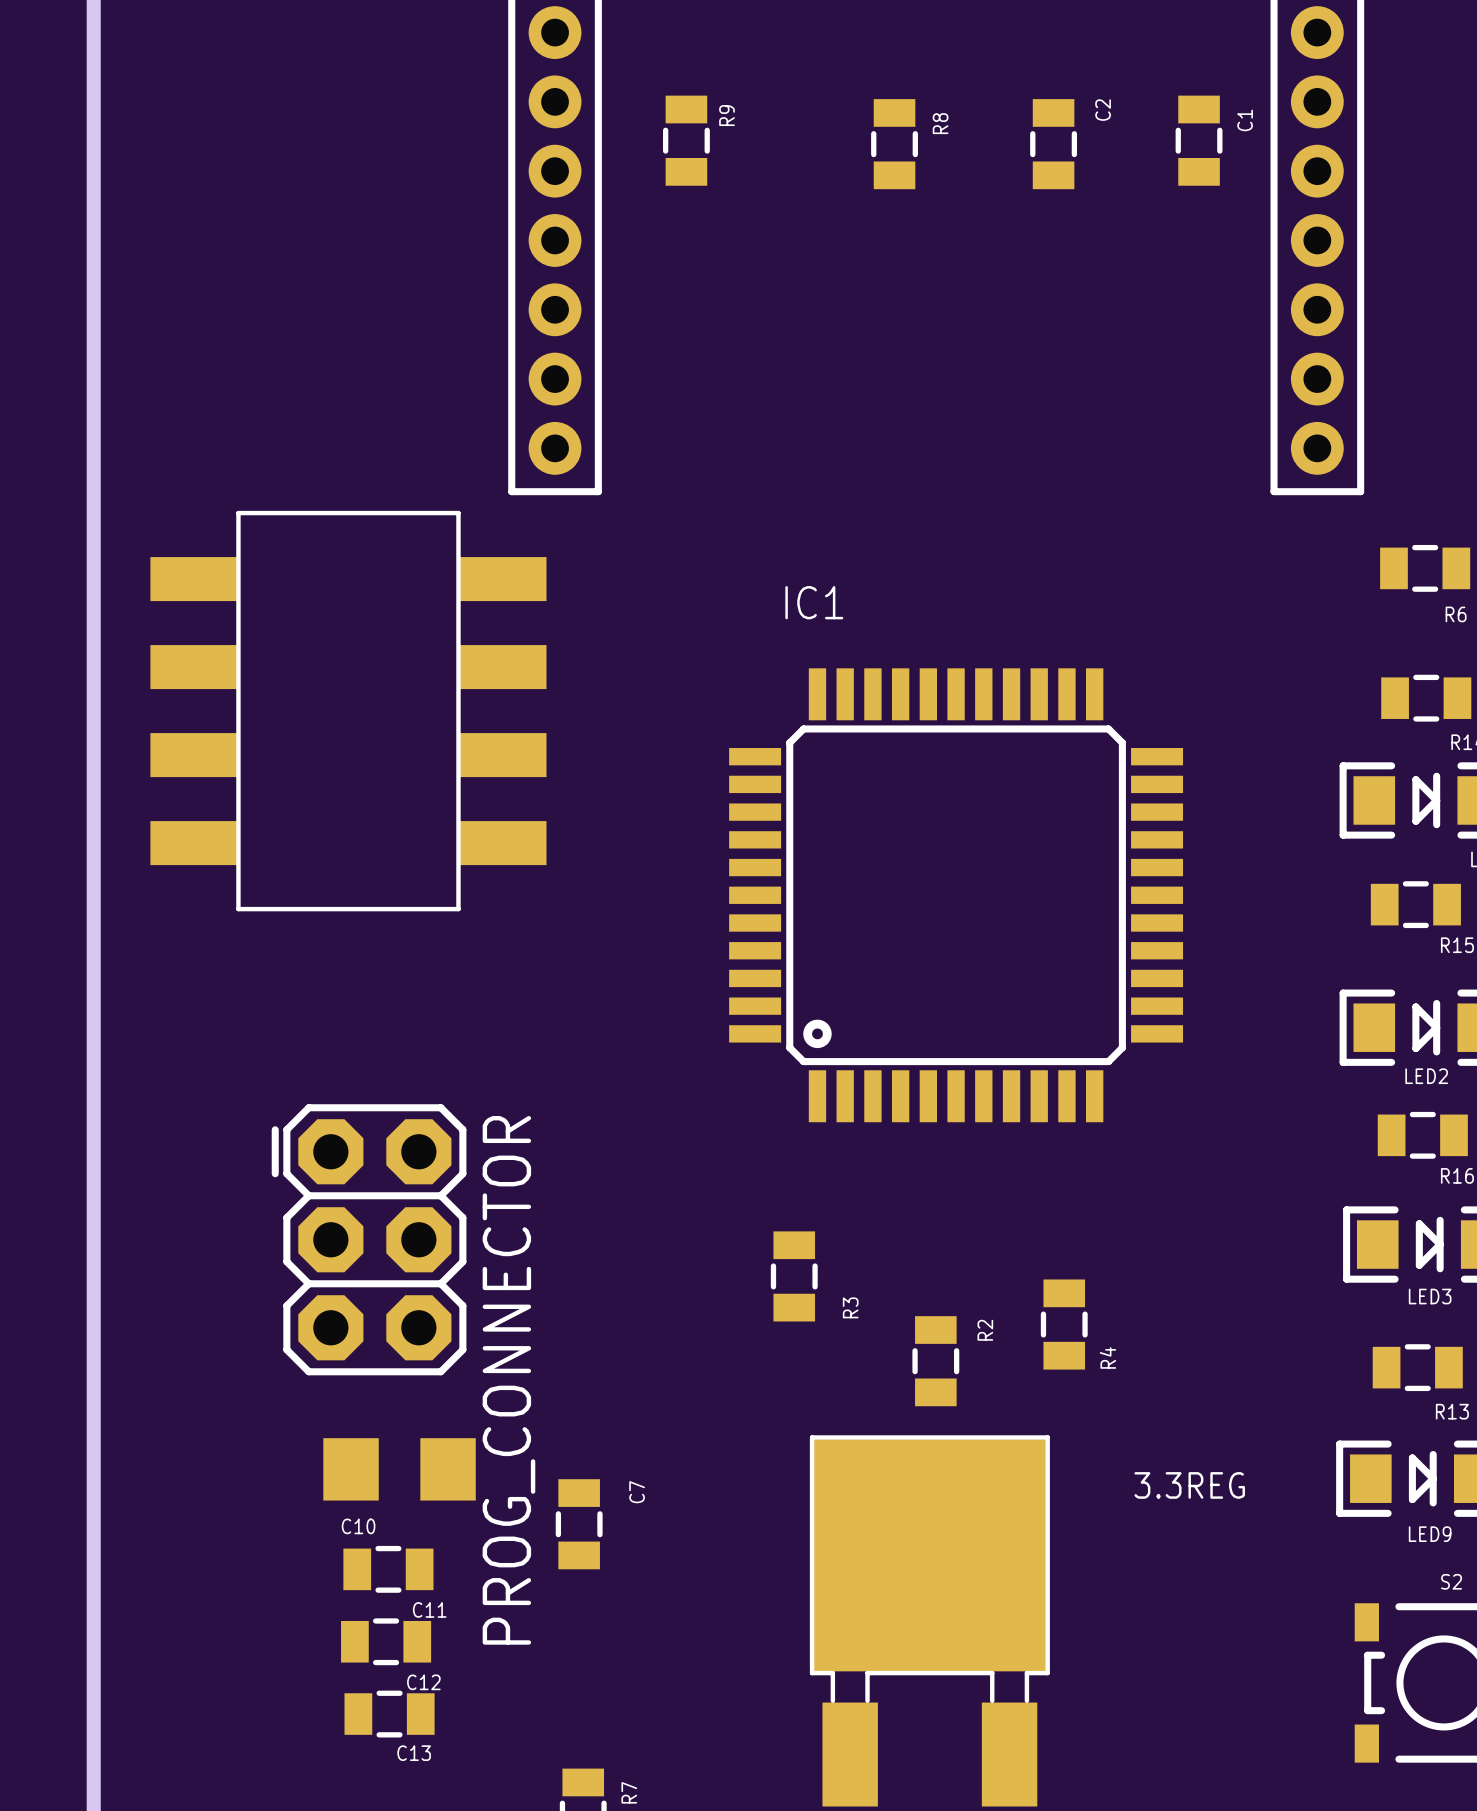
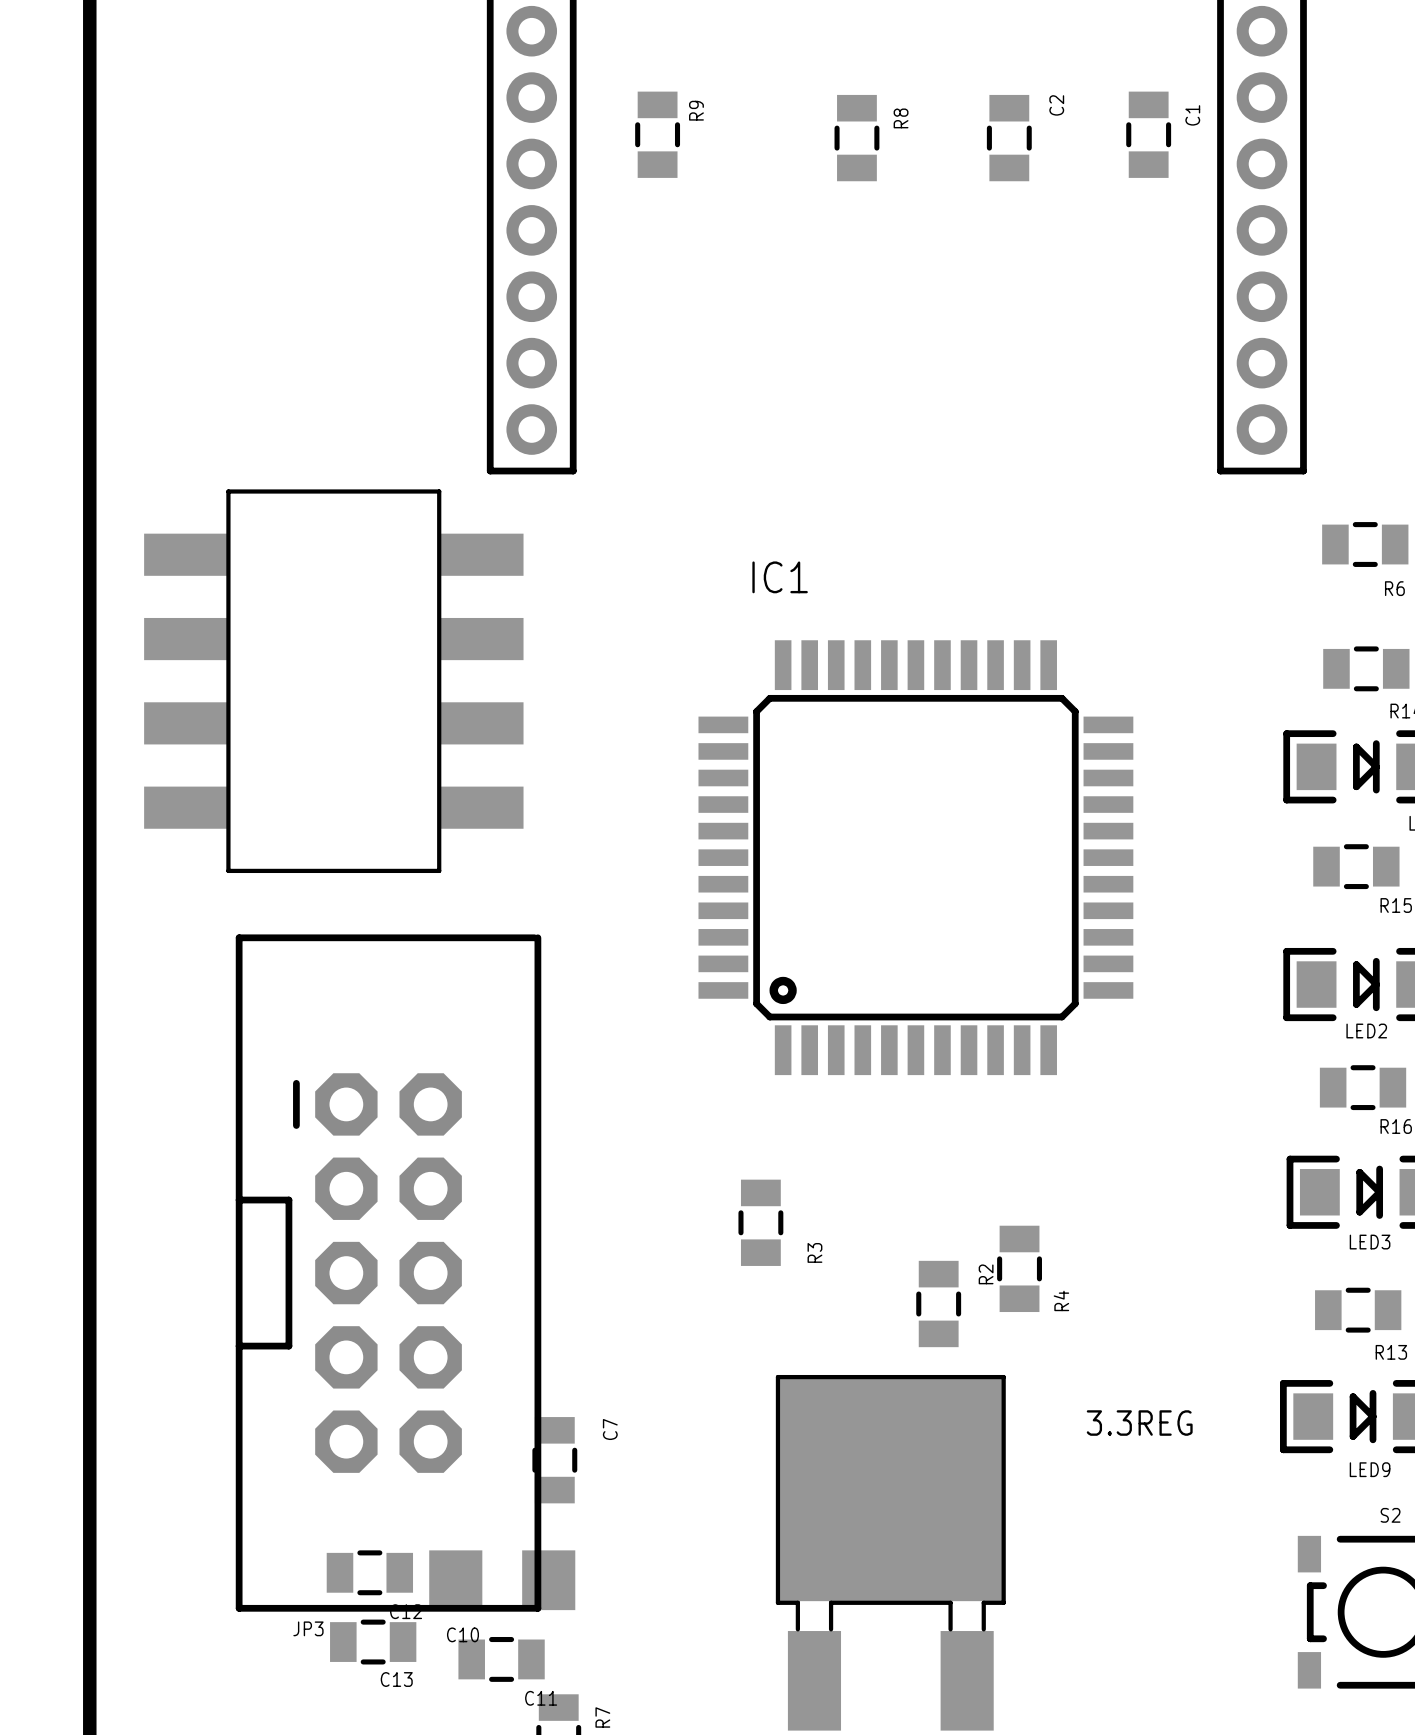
PROG_CONNECTOR: (369, 1239) -> none
JP3: none -> (388, 1273)
R2 position: (935, 1361) -> (938, 1304)
C10 position: (399, 1469) -> (502, 1580)
C11 position: (388, 1569) -> (501, 1659)

